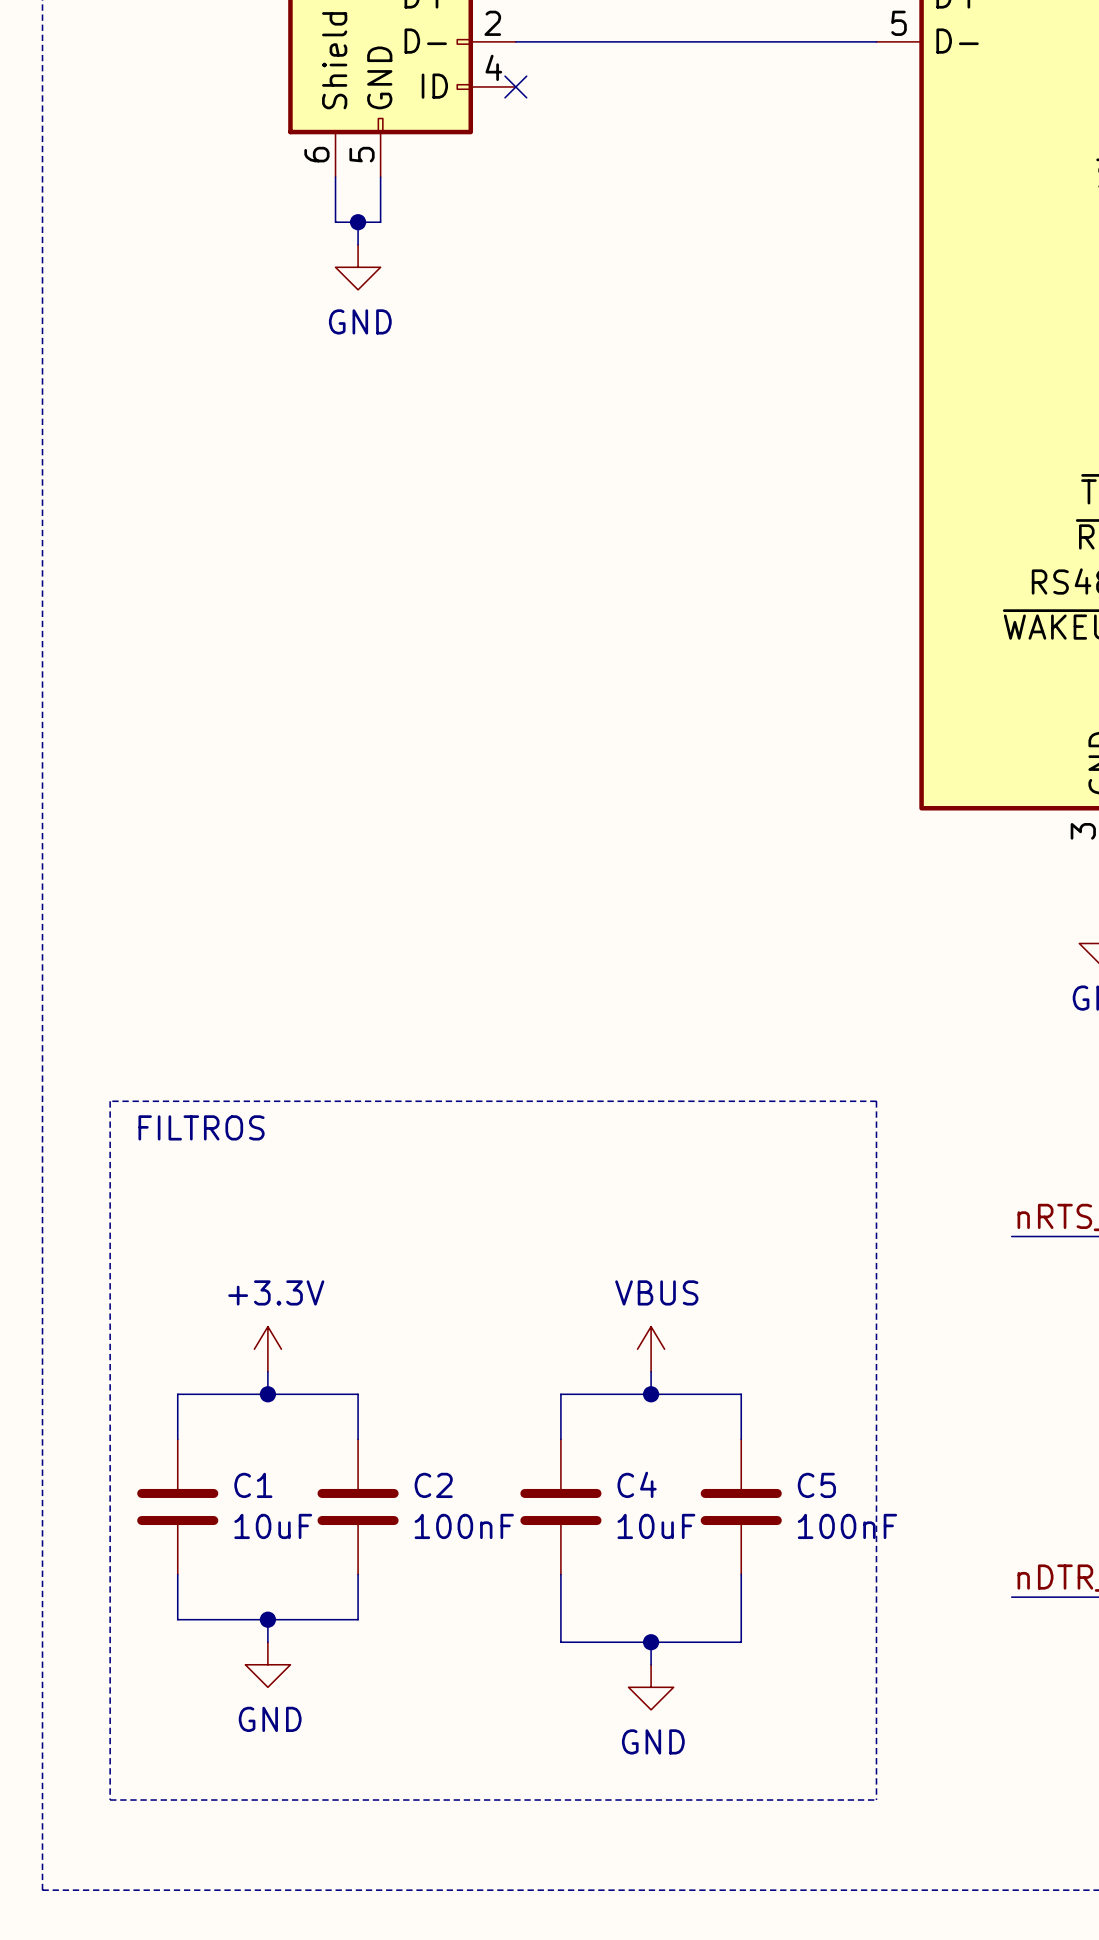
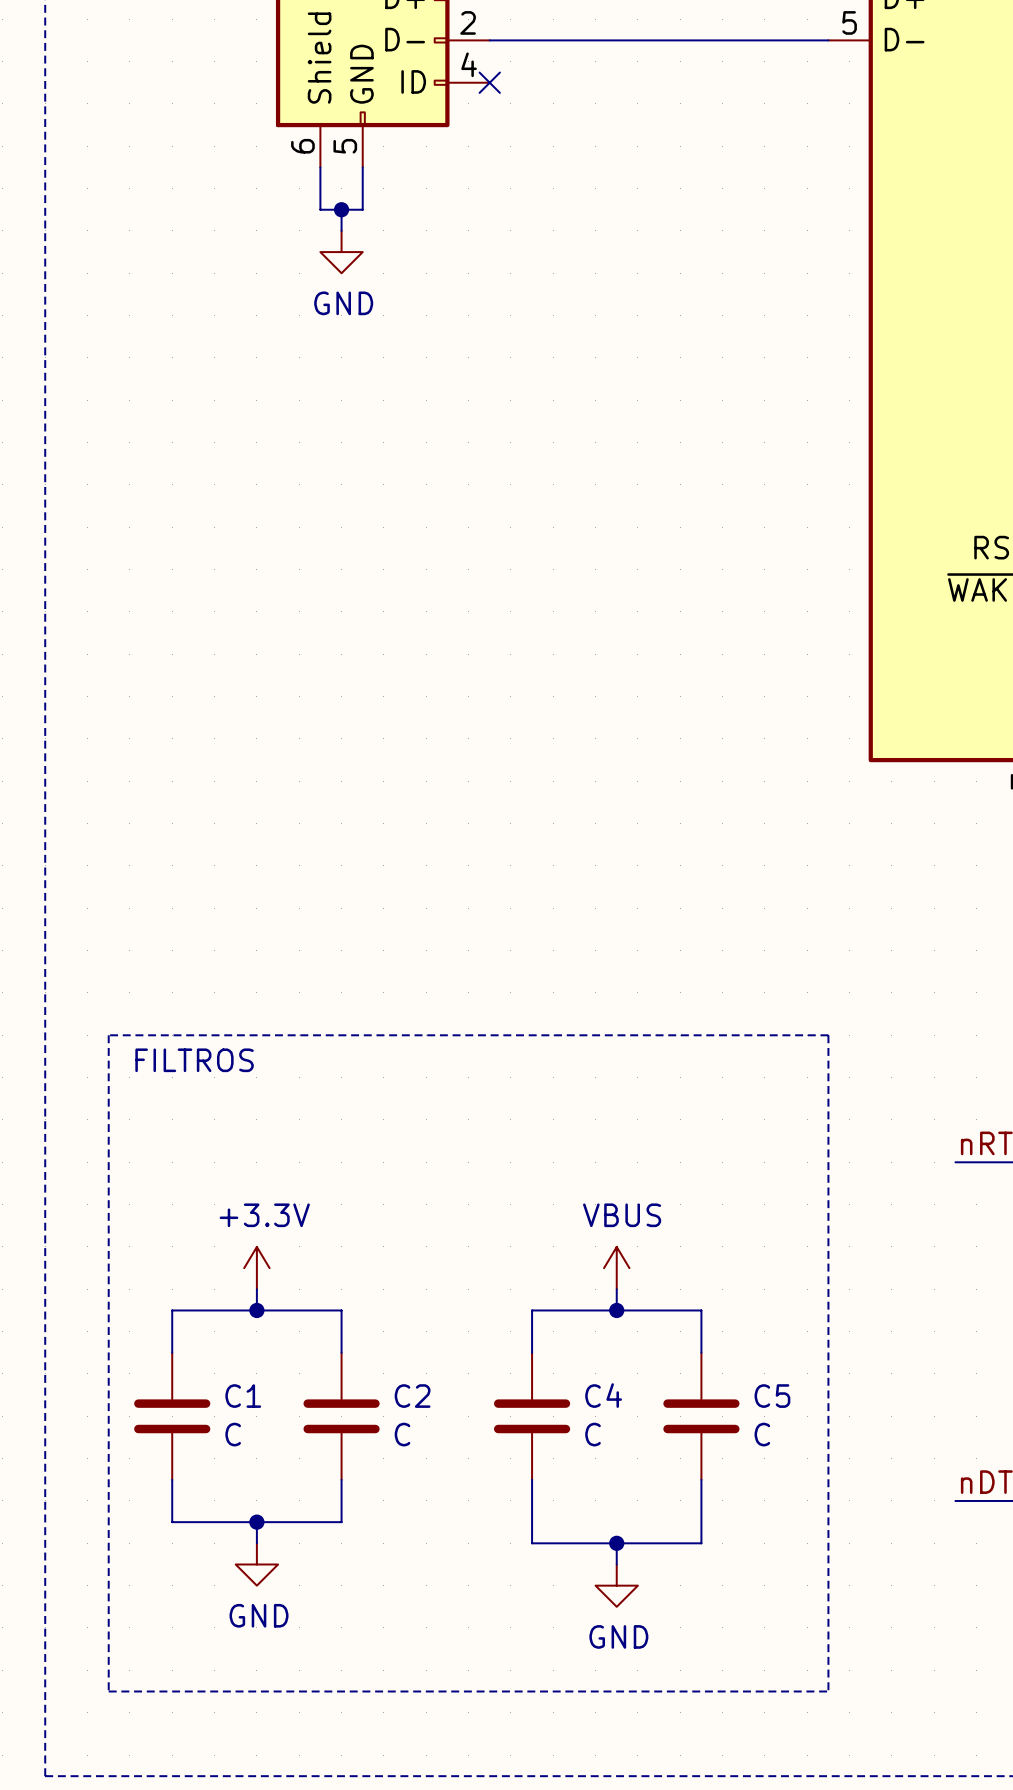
C1 value: 10uF (273, 1526) -> C (233, 1434)
C2 value: 100nF (464, 1526) -> C (402, 1434)
C4 value: 10uF (656, 1526) -> C (593, 1434)
C5 value: 100nF (847, 1526) -> C (762, 1434)

